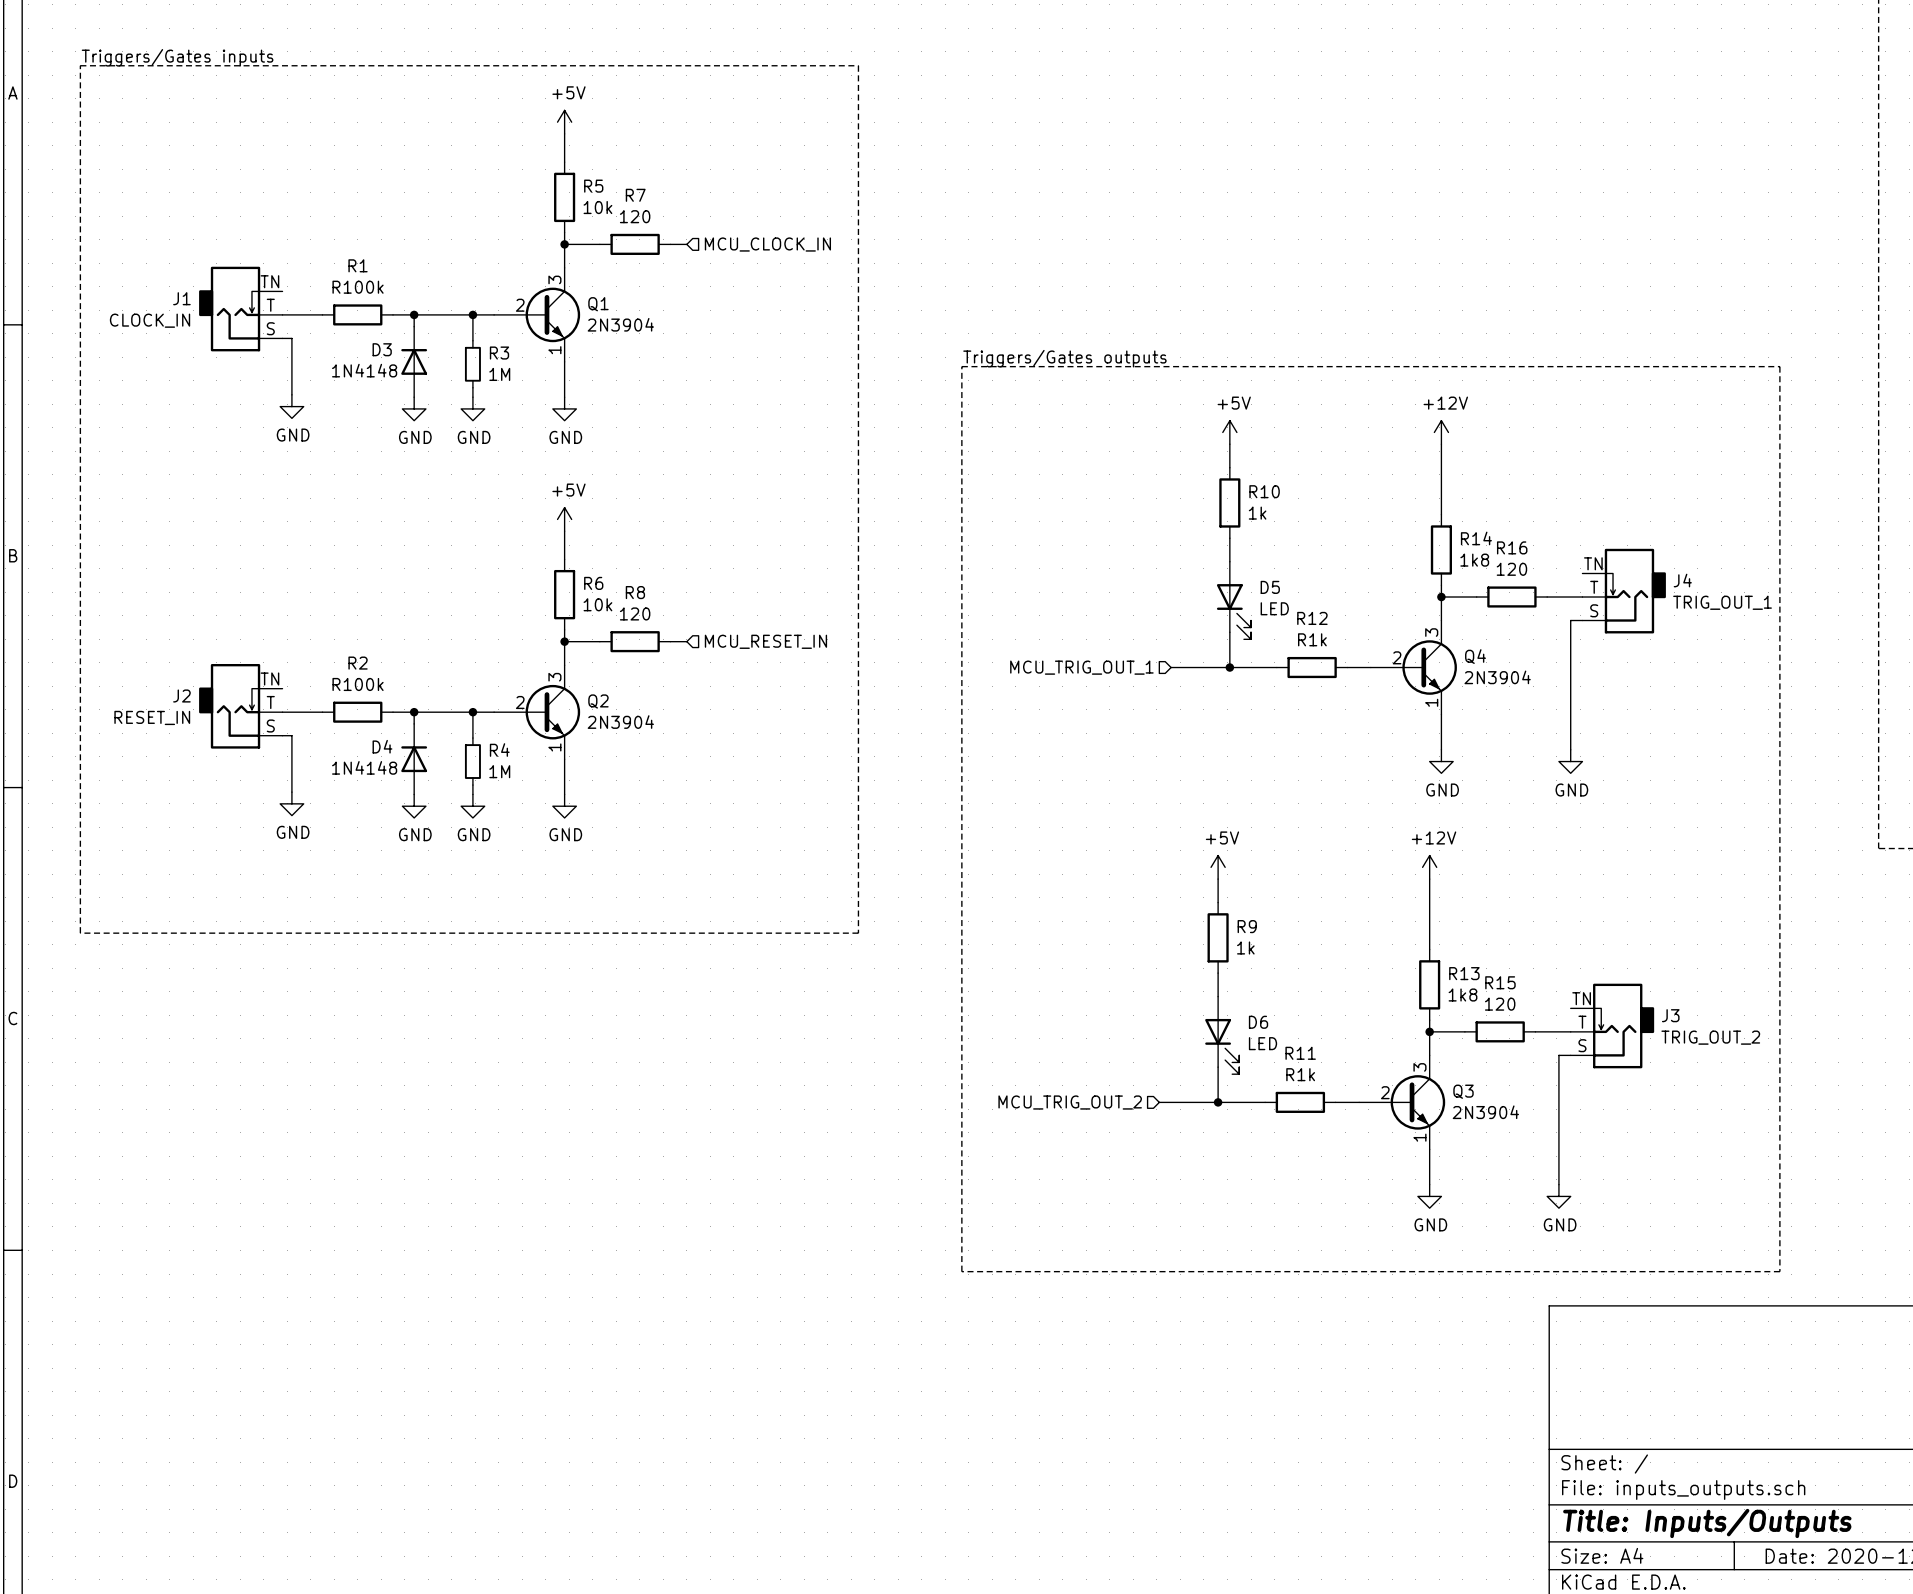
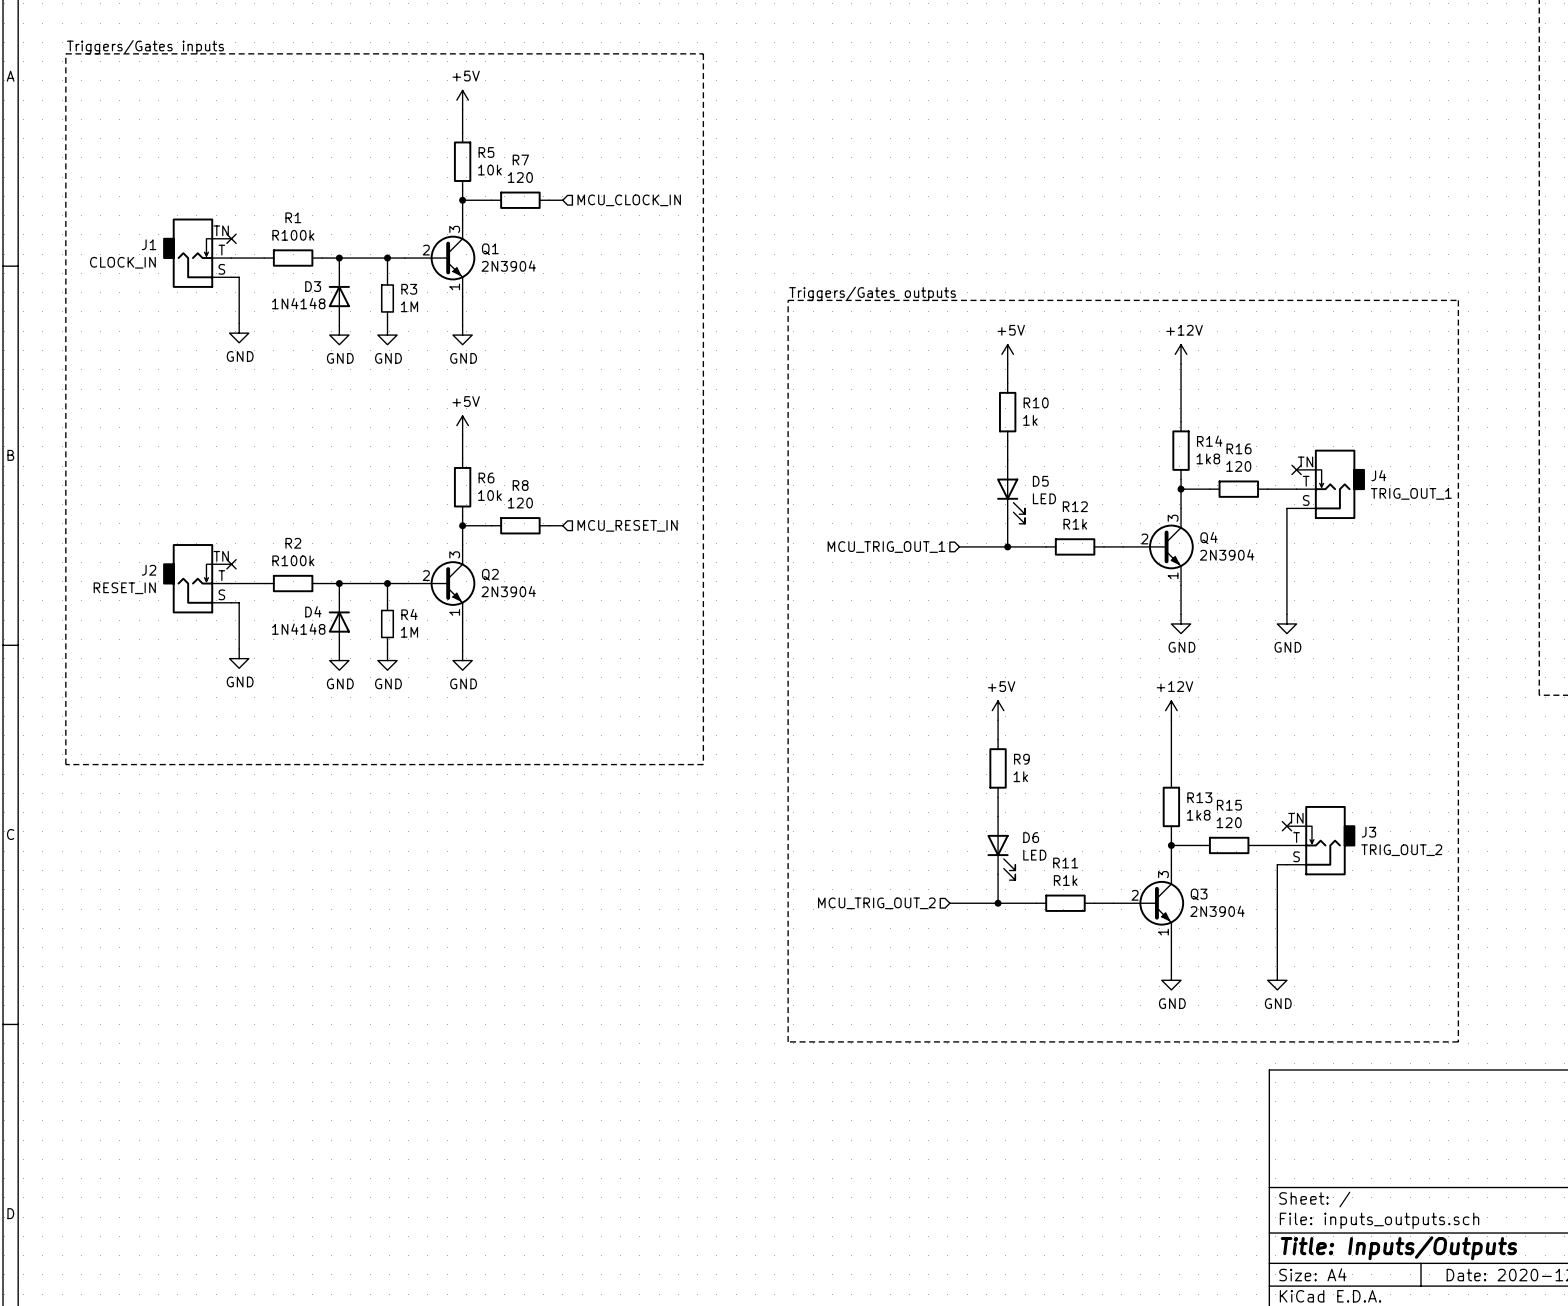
no-connect mark: none -> (231, 238)
no-connect mark: none -> (1296, 469)
no-connect mark: none -> (231, 564)
no-connect mark: none -> (1286, 826)

